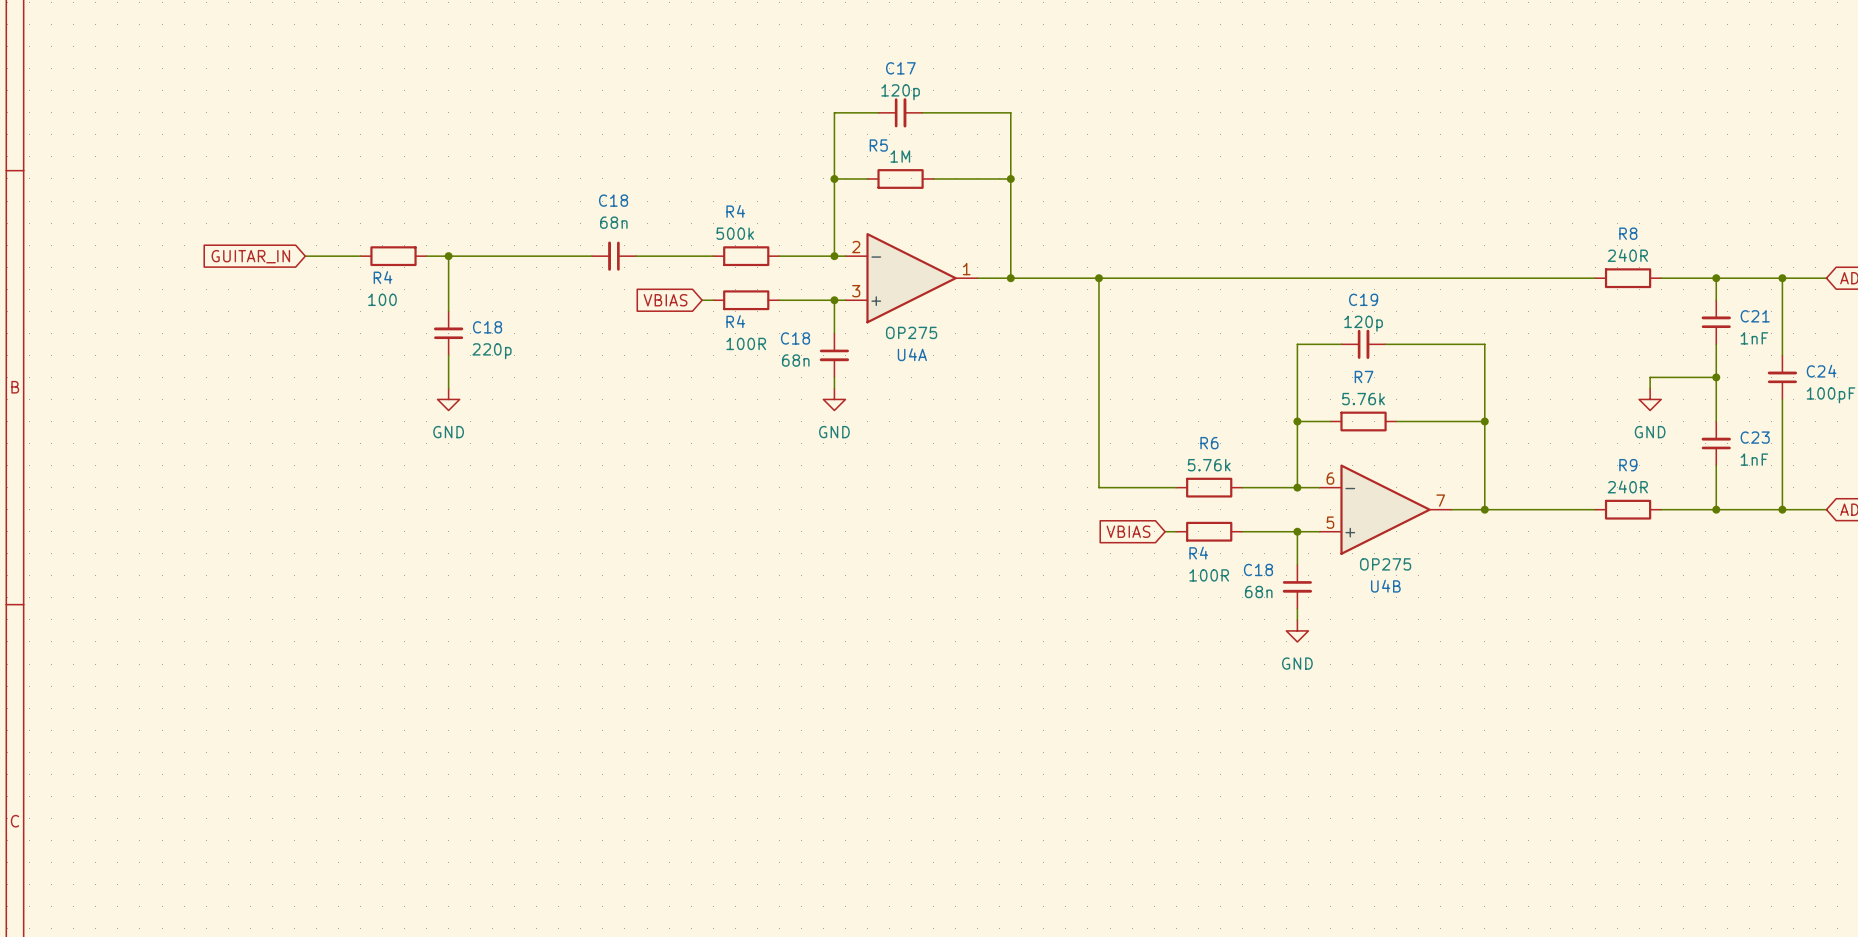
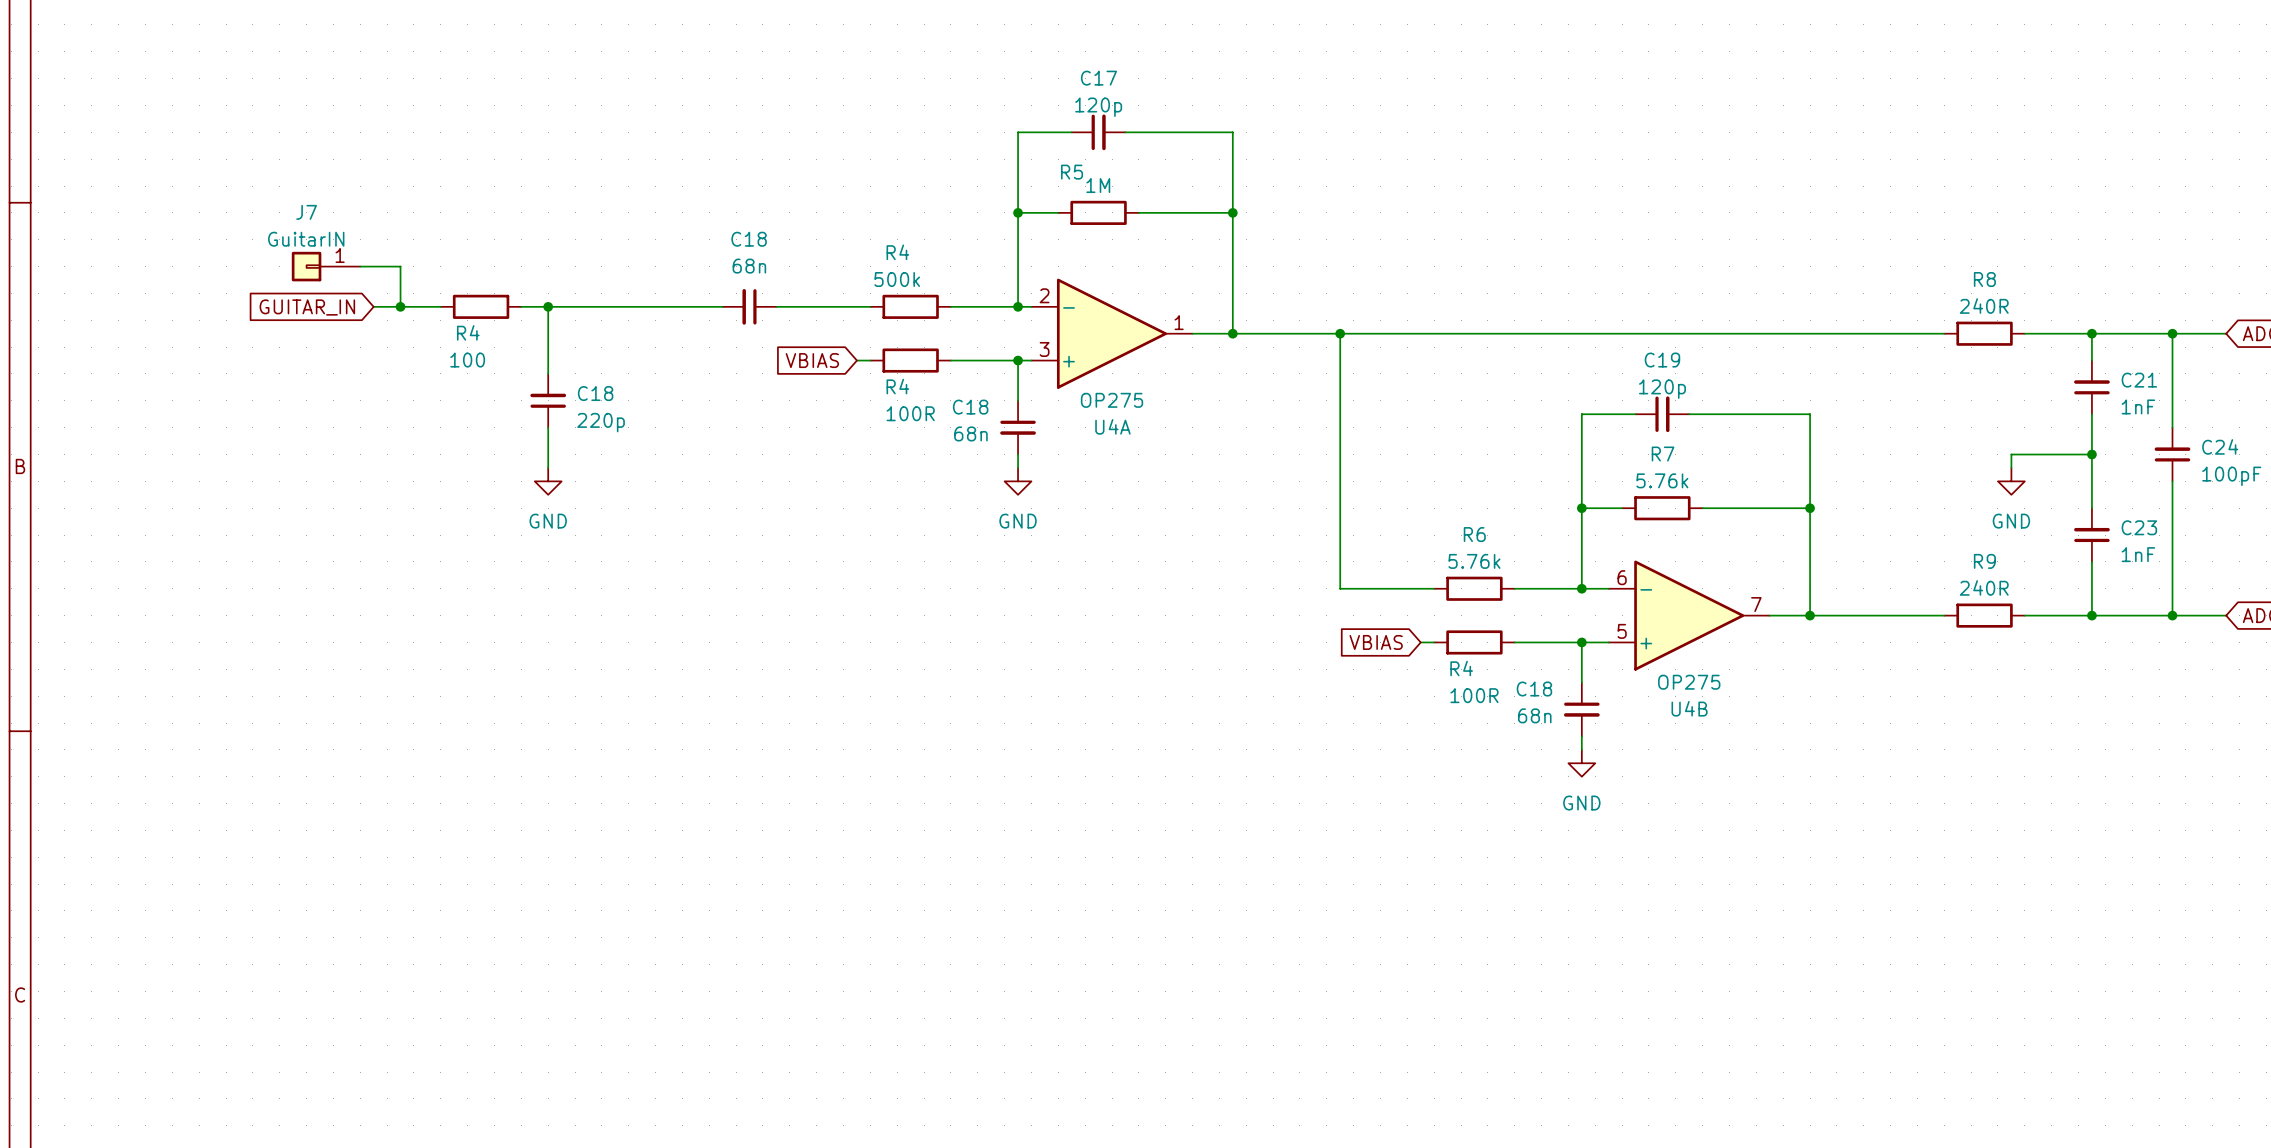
J7: none -> GuitarIN (326, 266)
wire: none -> (360, 266) (400, 266) (400, 306)
junction: none -> (400, 306)

